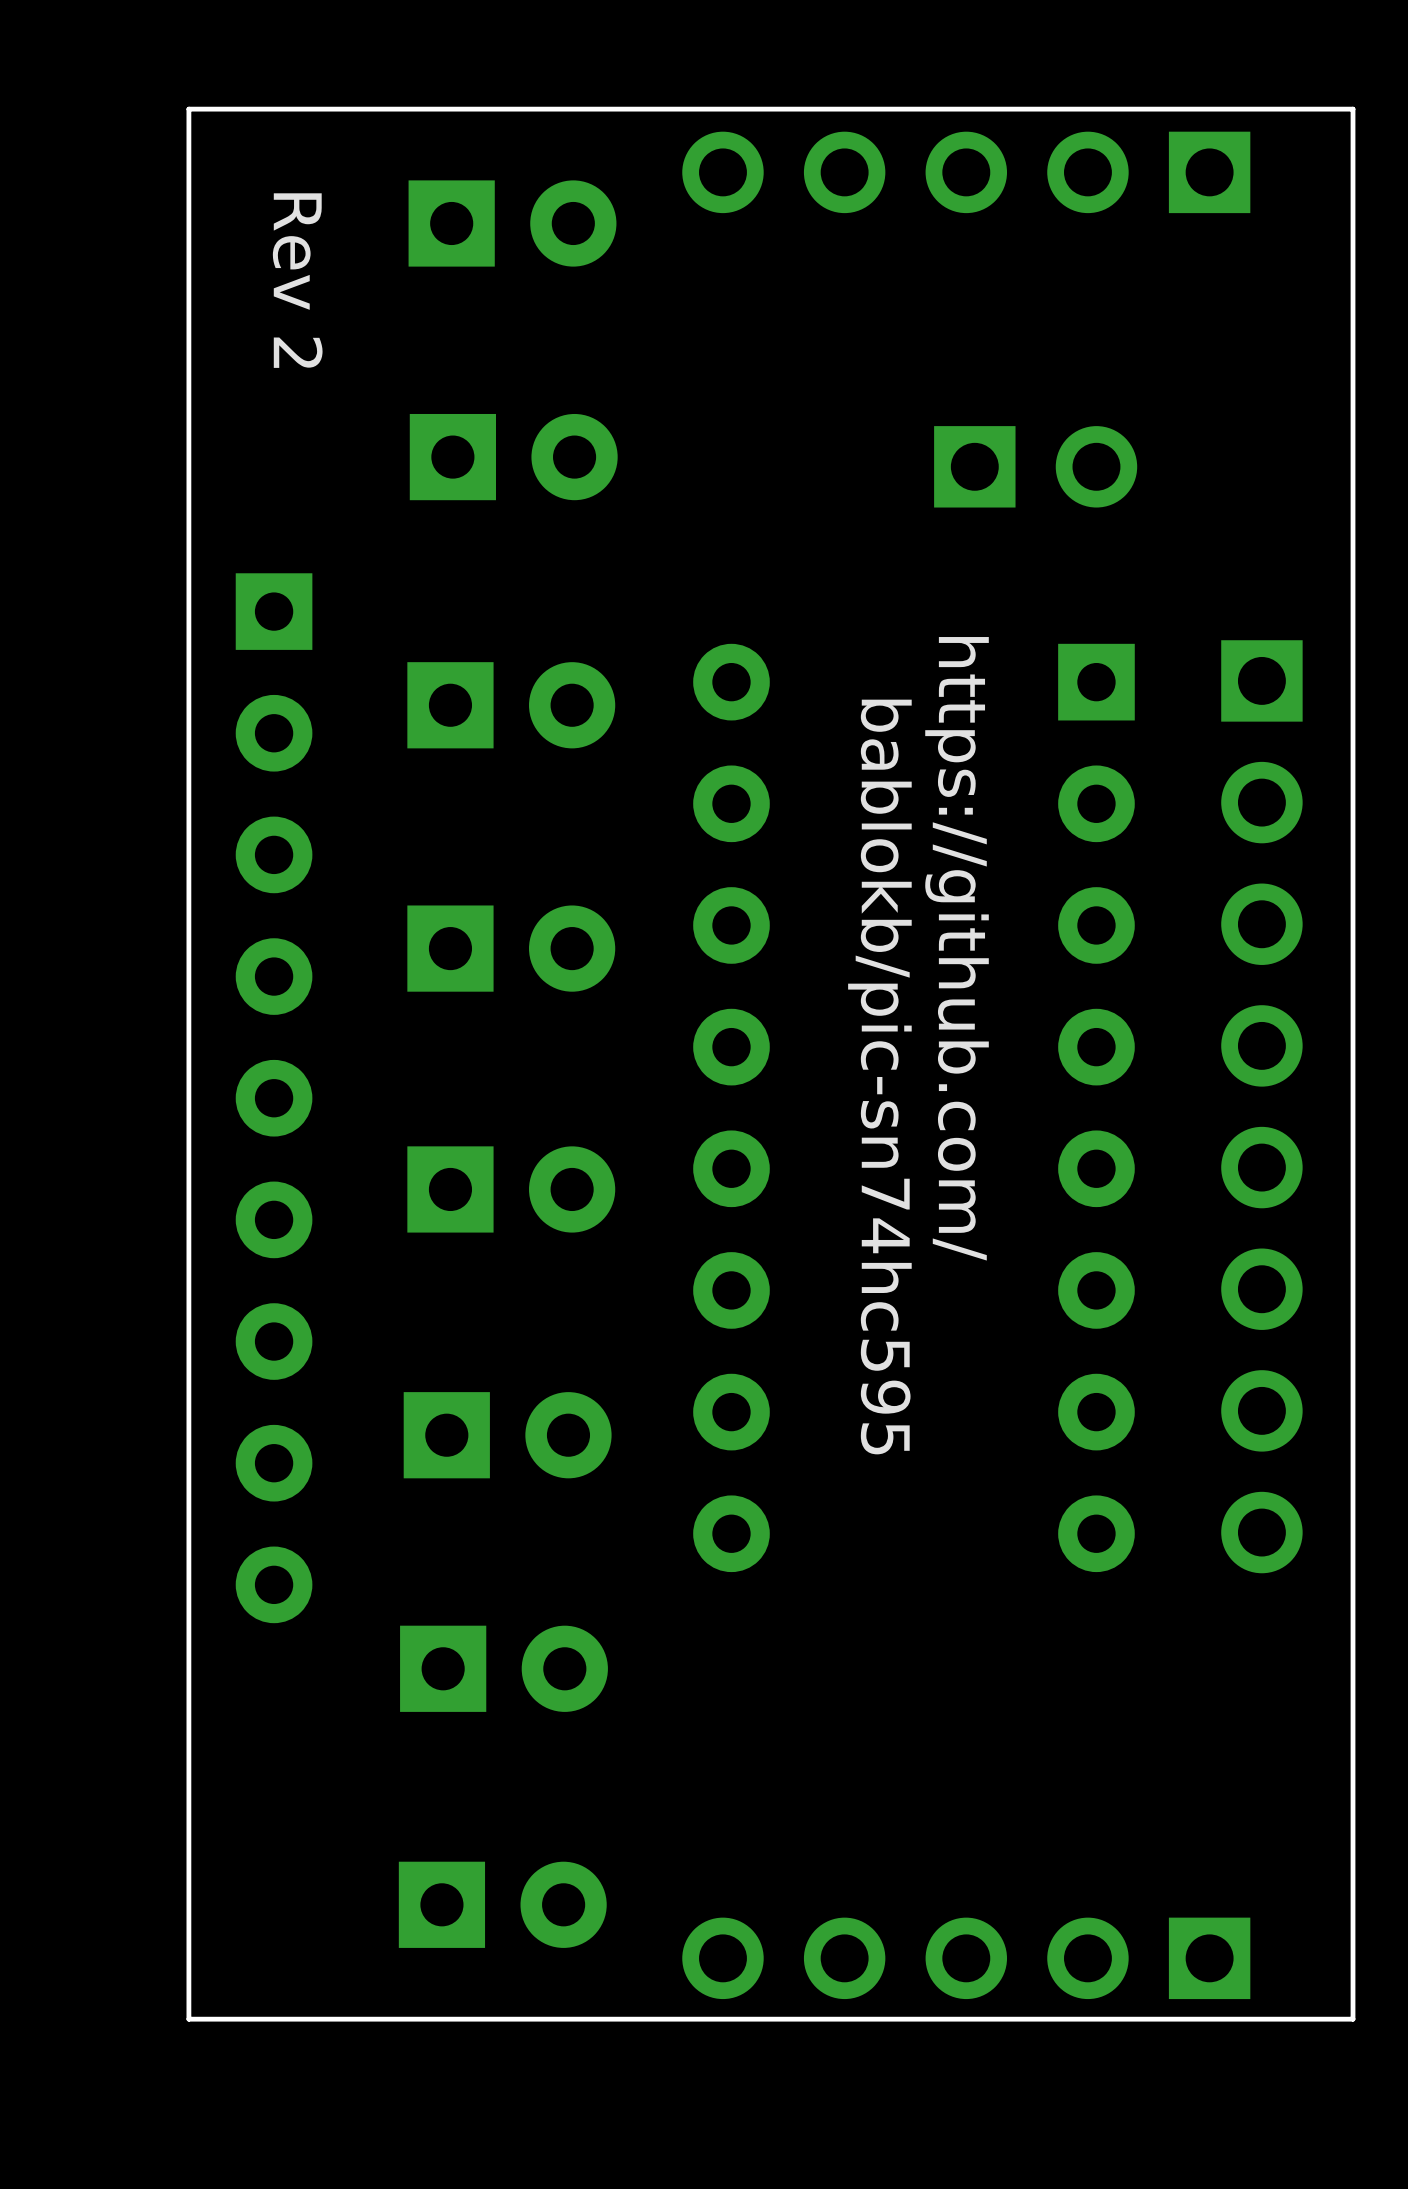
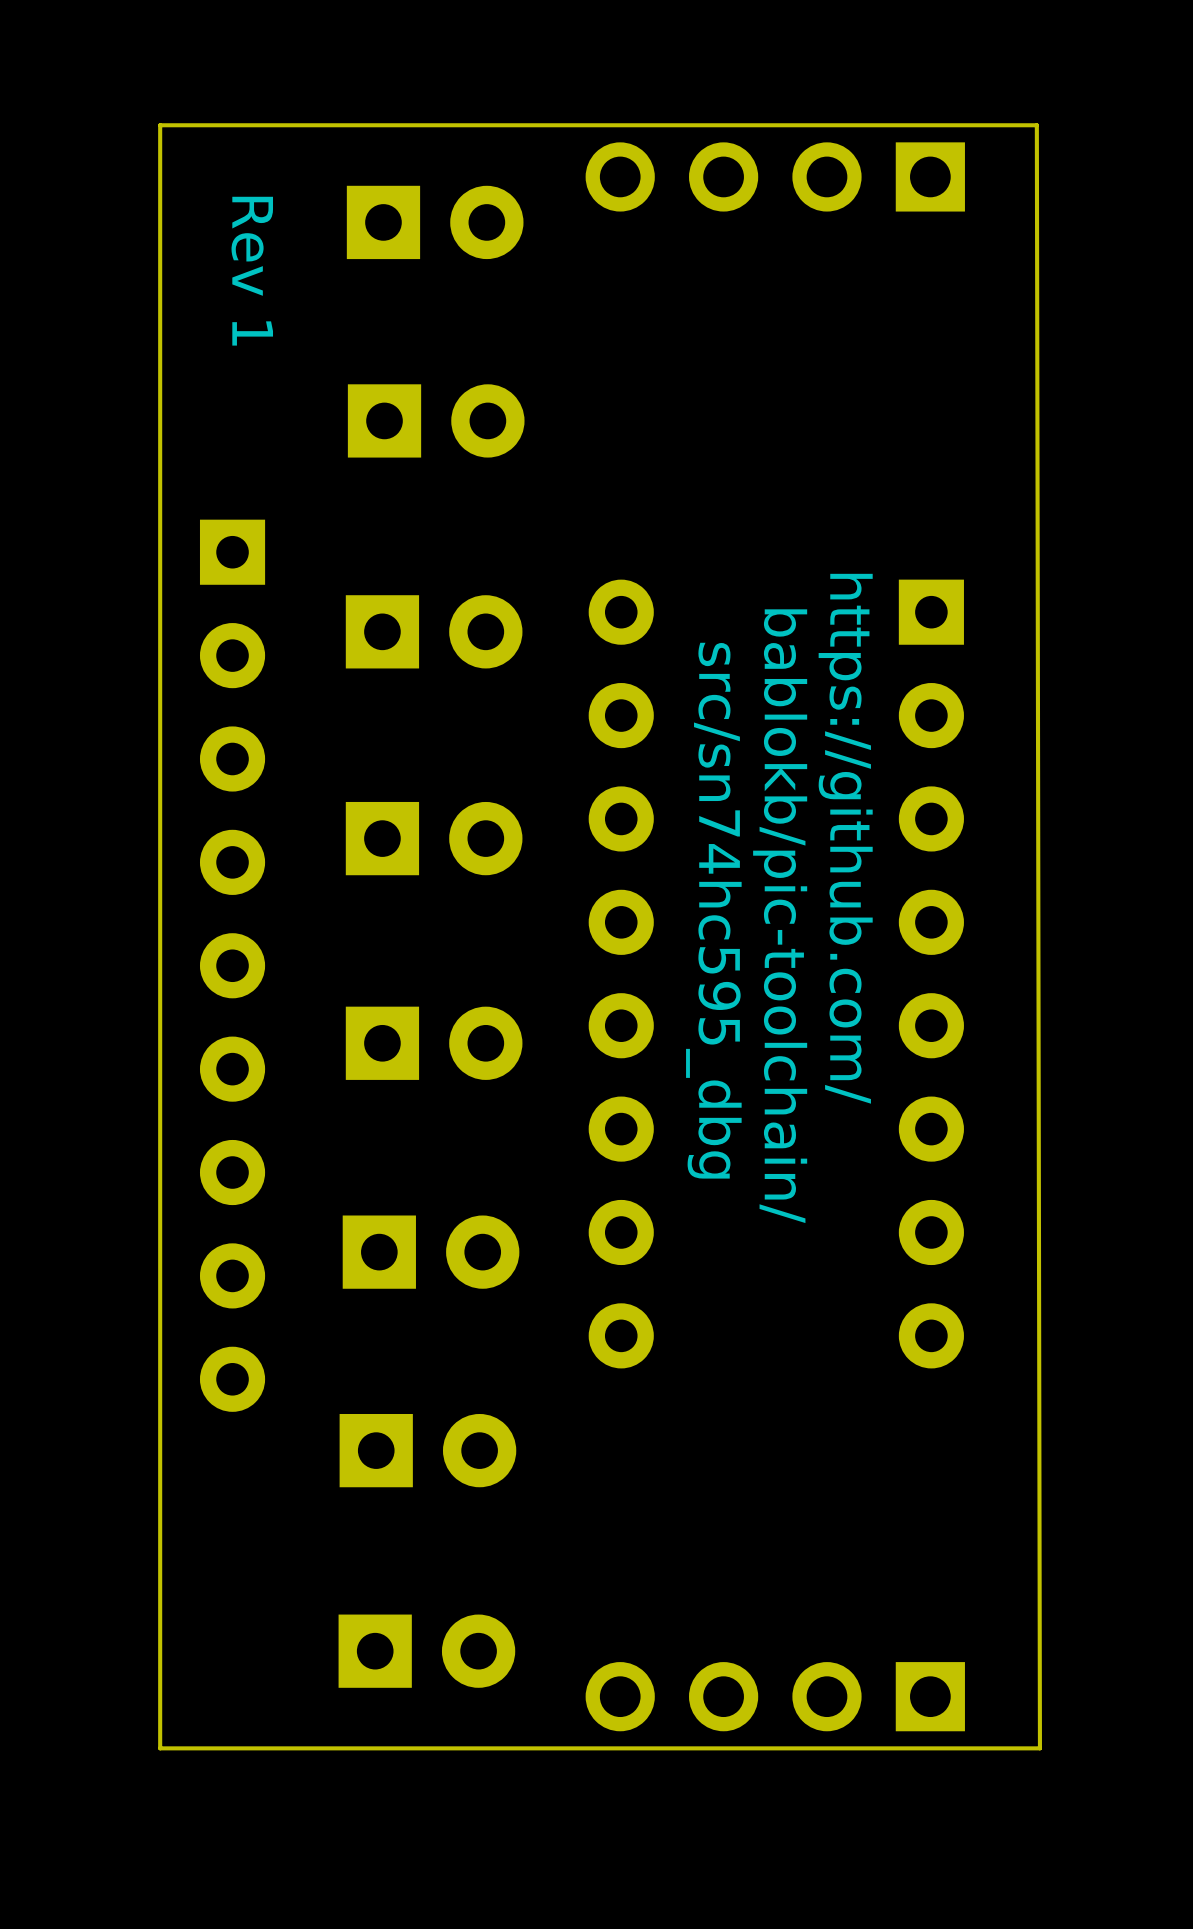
board edge: (1220, 109) (1353, 109) (1353, 2019) (1224, 2019) -> (1036, 125) (1039, 1748)
part: none -> (775, 176)
part: (966, 172) -> none
text: Rev 2 (297, 280) -> Rev 1 (252, 271)
part: (1035, 466) -> none
text position: https://github.com/ (957, 948) -> https://github.com/ (845, 838)
text: none -> src/sn74hc595_dbg (713, 910)
text: bablokb/pic-sn74hc595 (879, 1077) -> bablokb/pic-toolchain/ (780, 916)
part: (1261, 1106) -> none
part: none -> (775, 1696)
part: (966, 1958) -> none

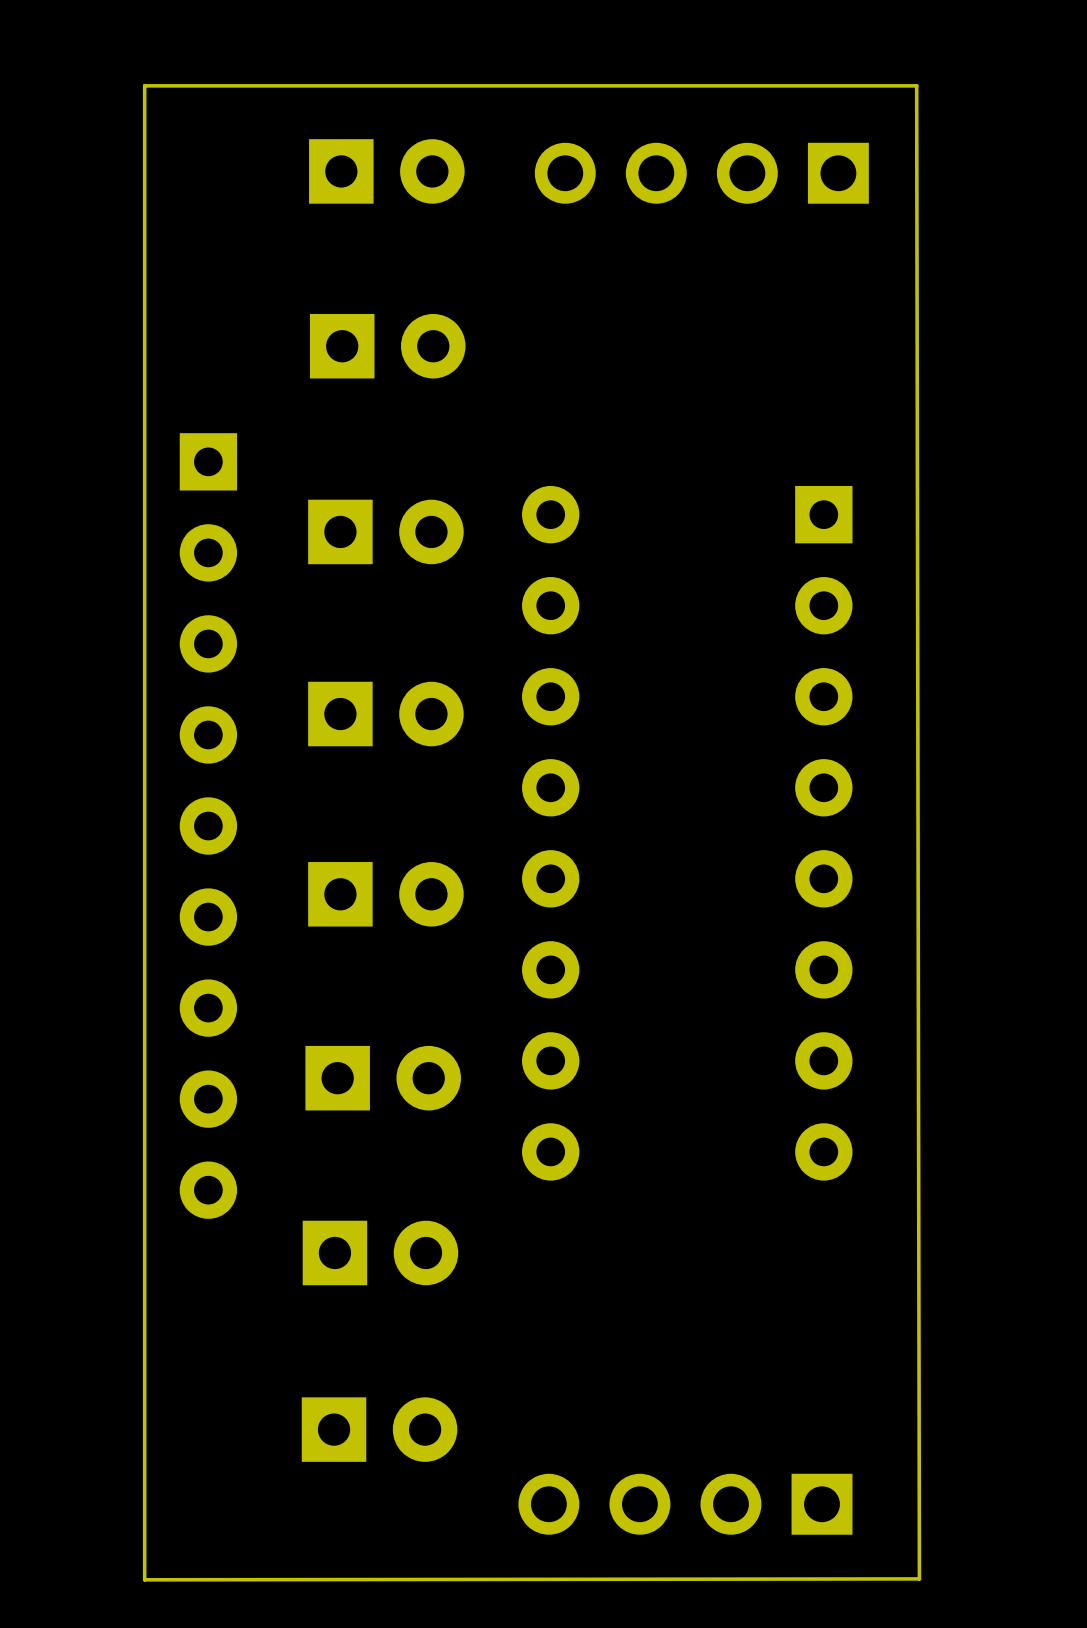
board edge: (1036, 125) (1039, 1748) (160, 1748) -> (916, 85) (919, 1578) (144, 1579) (144, 1515)
part position: (775, 176) -> (701, 173)
text: Rev 1 (252, 271) -> none
text: https://github.com/ (845, 838) -> none
text: src/sn74hc595_dbg (713, 910) -> none
text: bablokb/pic-toolchain/ (780, 916) -> none
part position: (775, 1696) -> (685, 1504)

